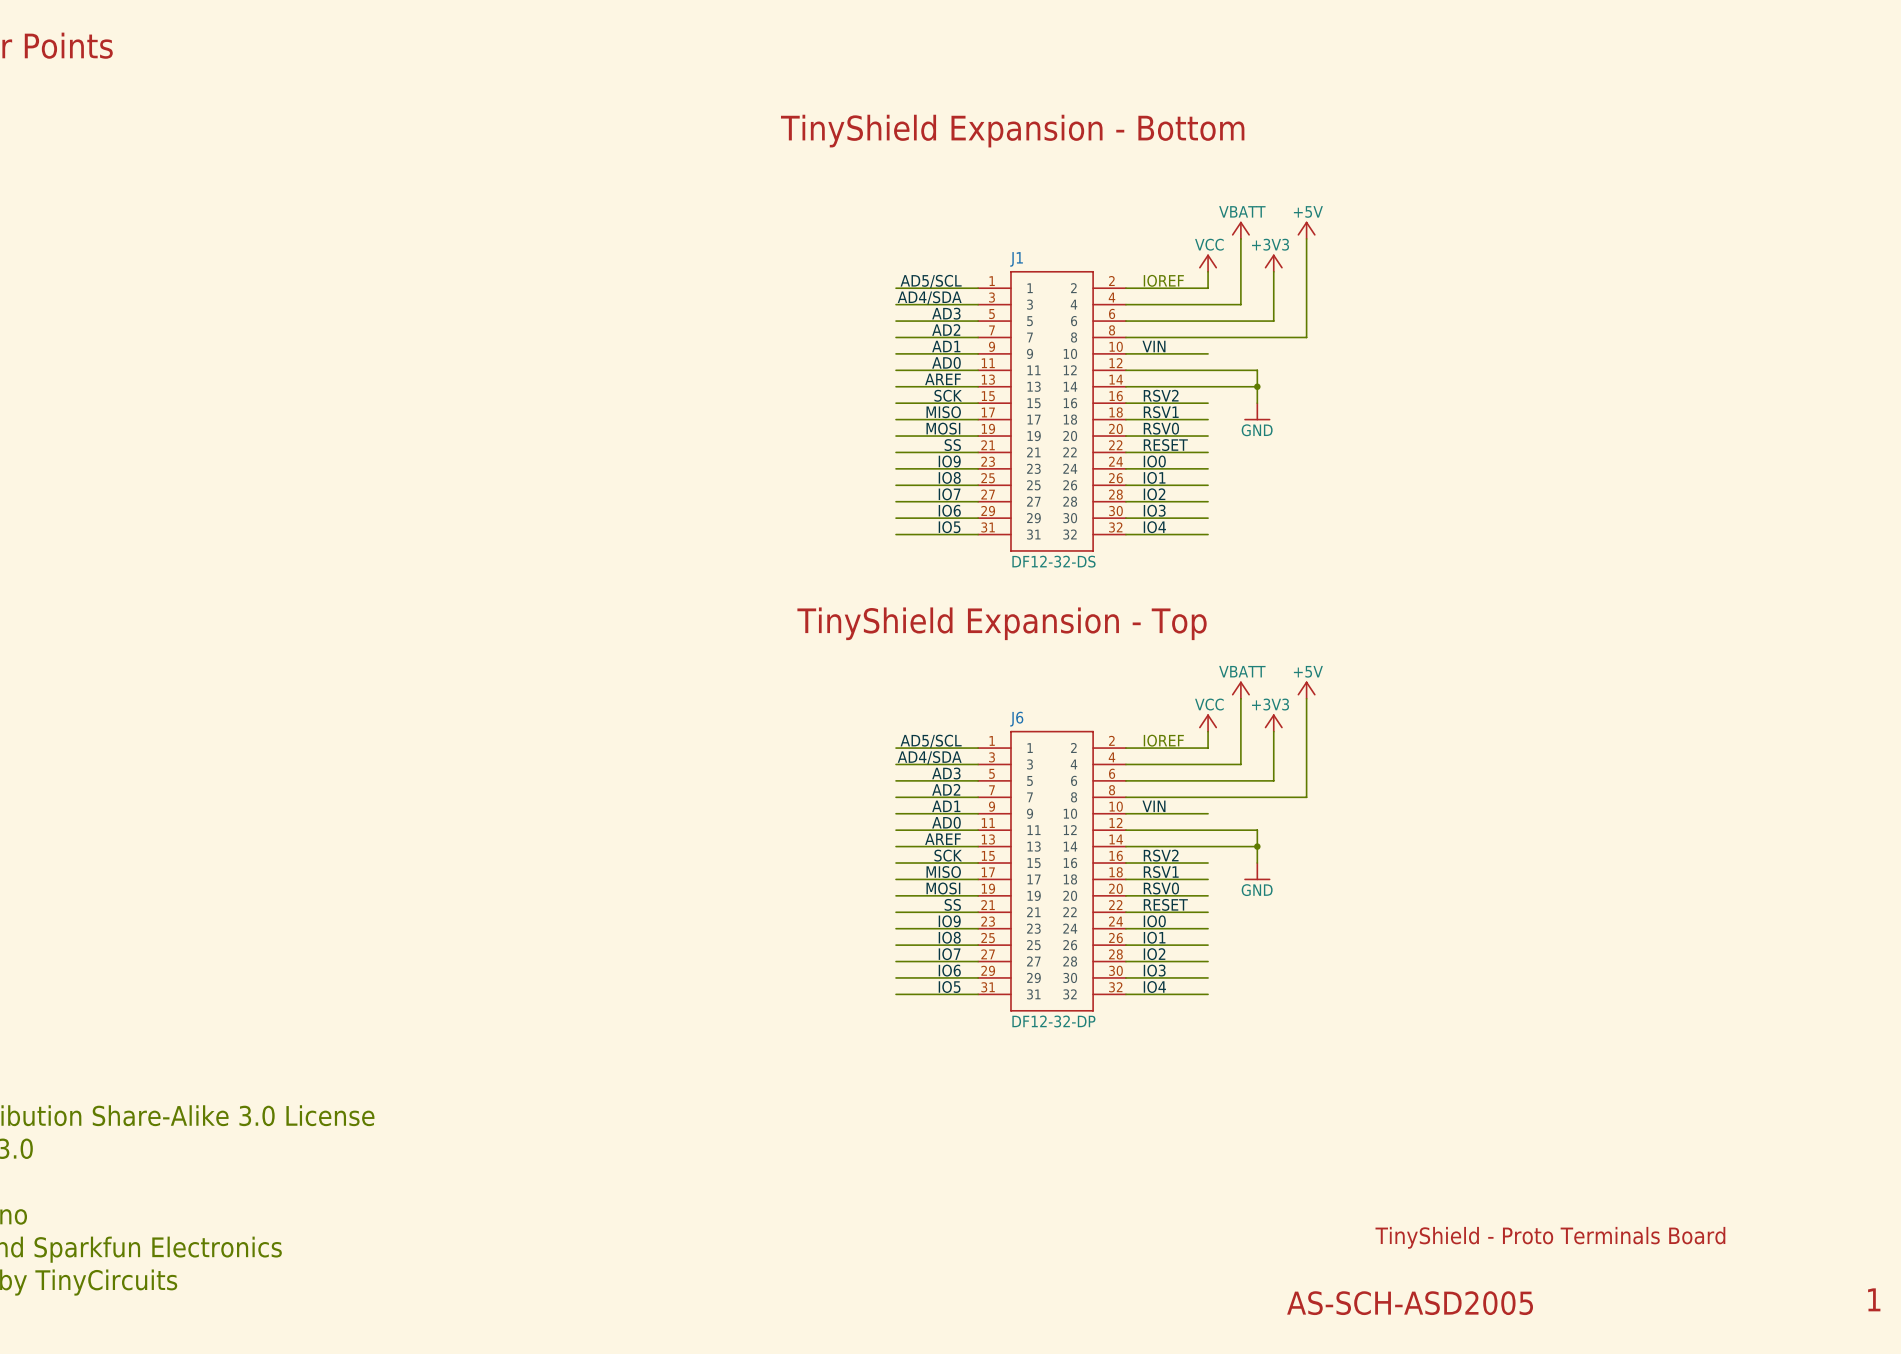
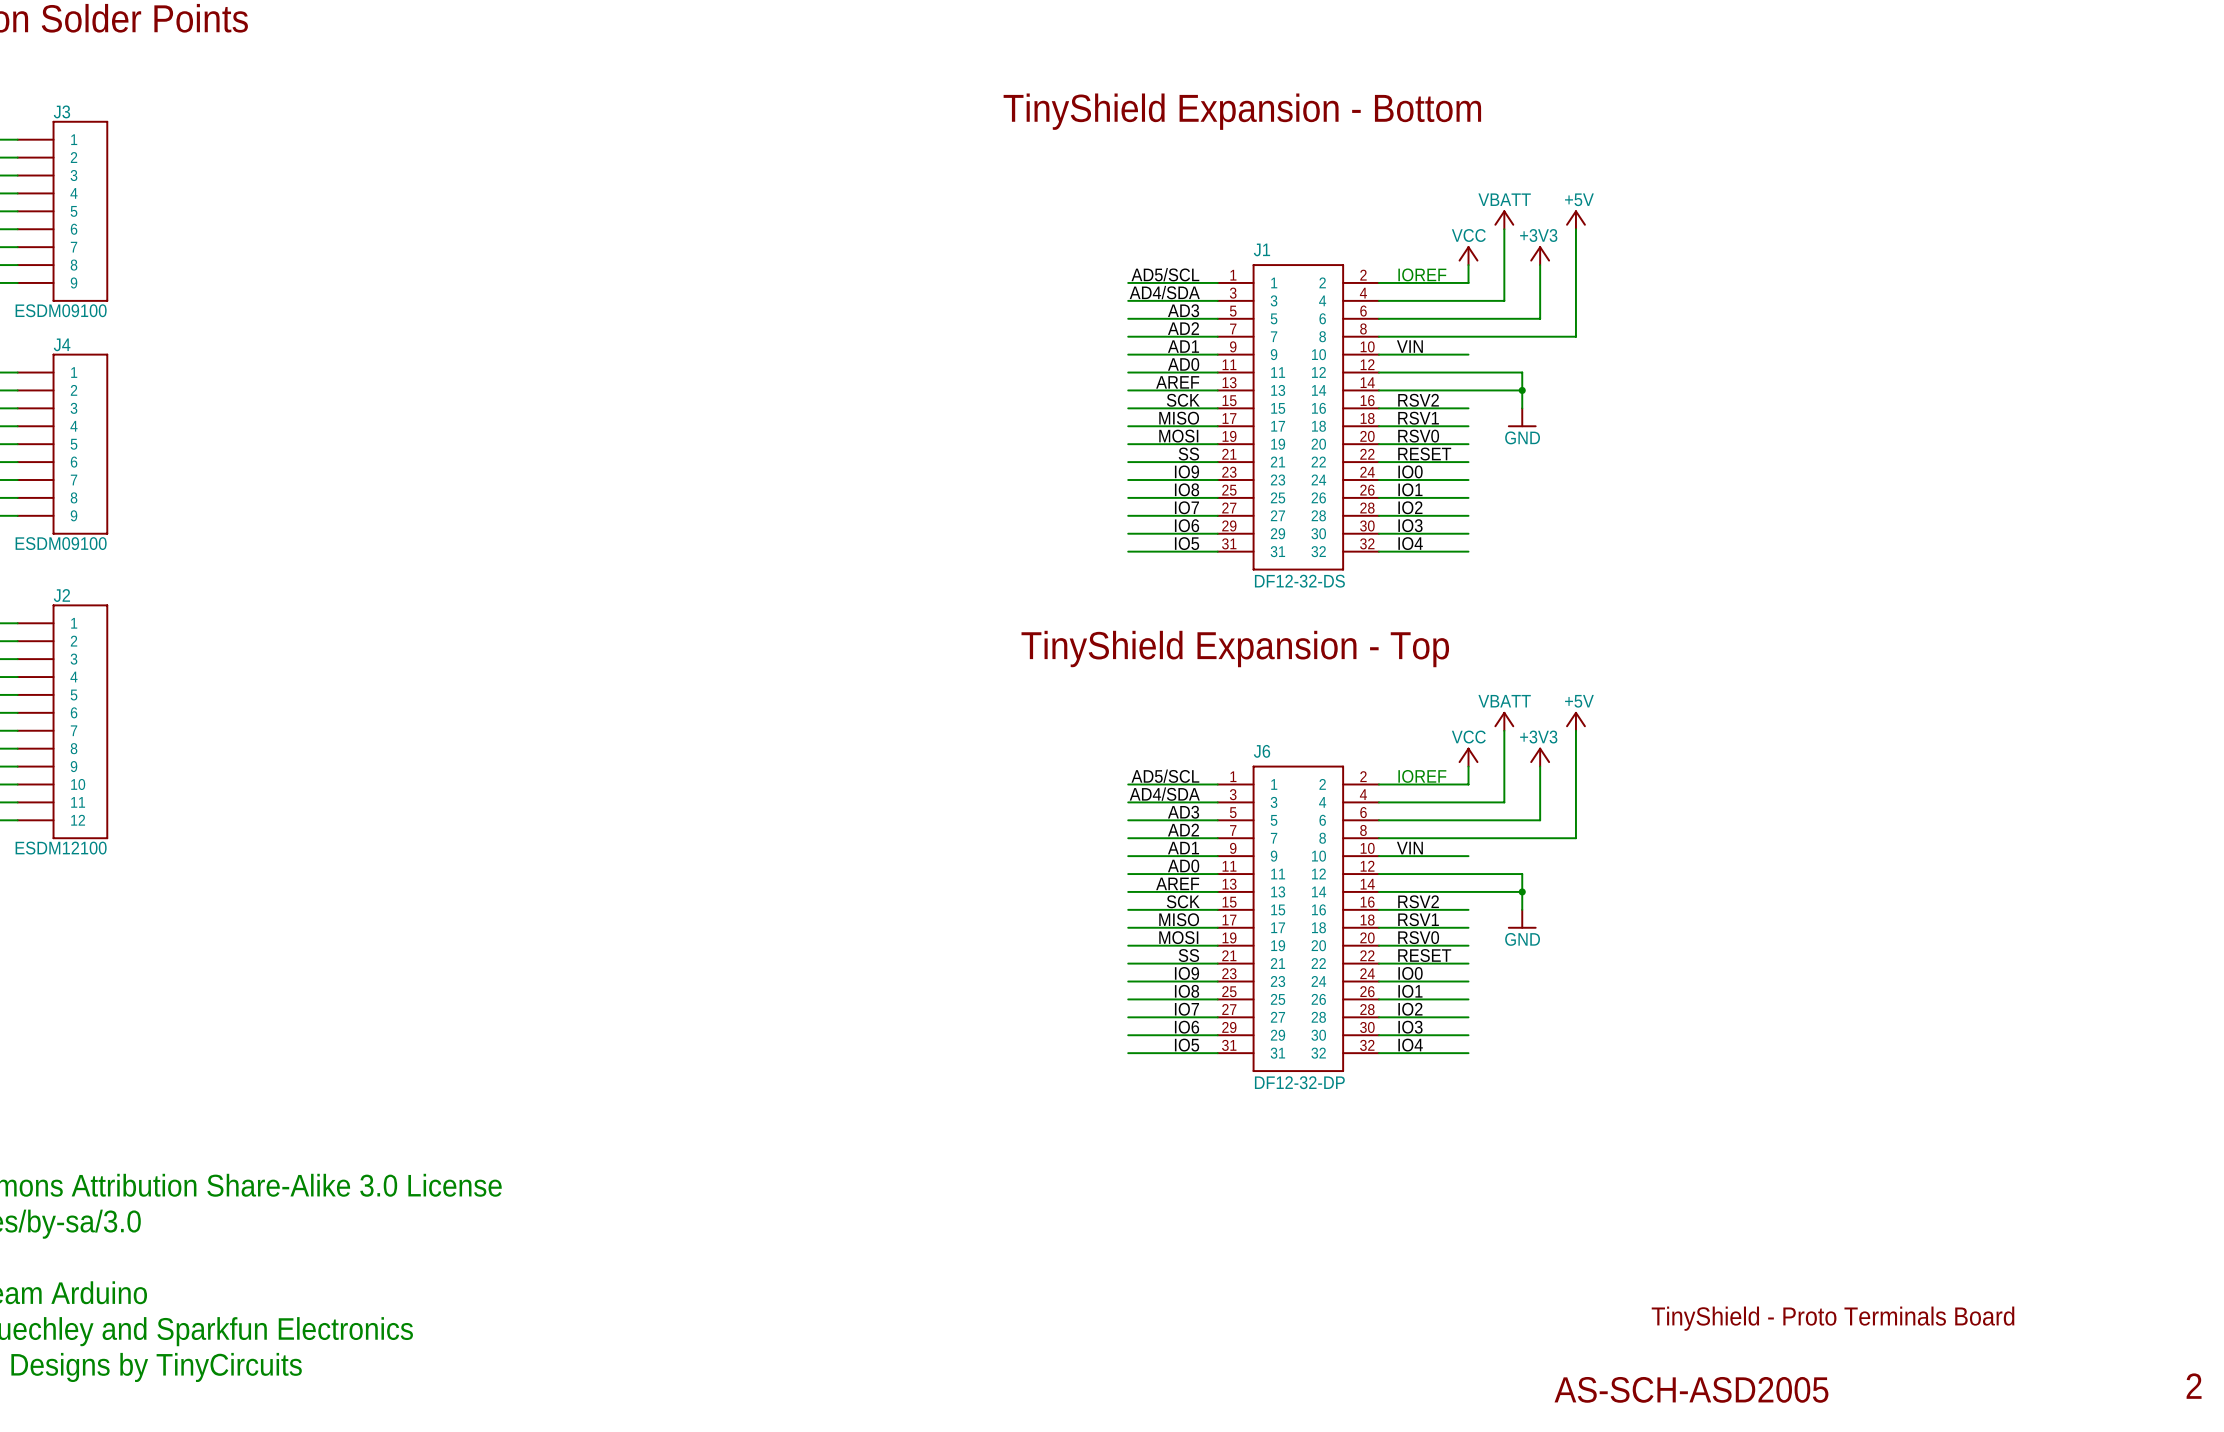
text: 1 (1874, 1299) -> 2 (2194, 1386)

